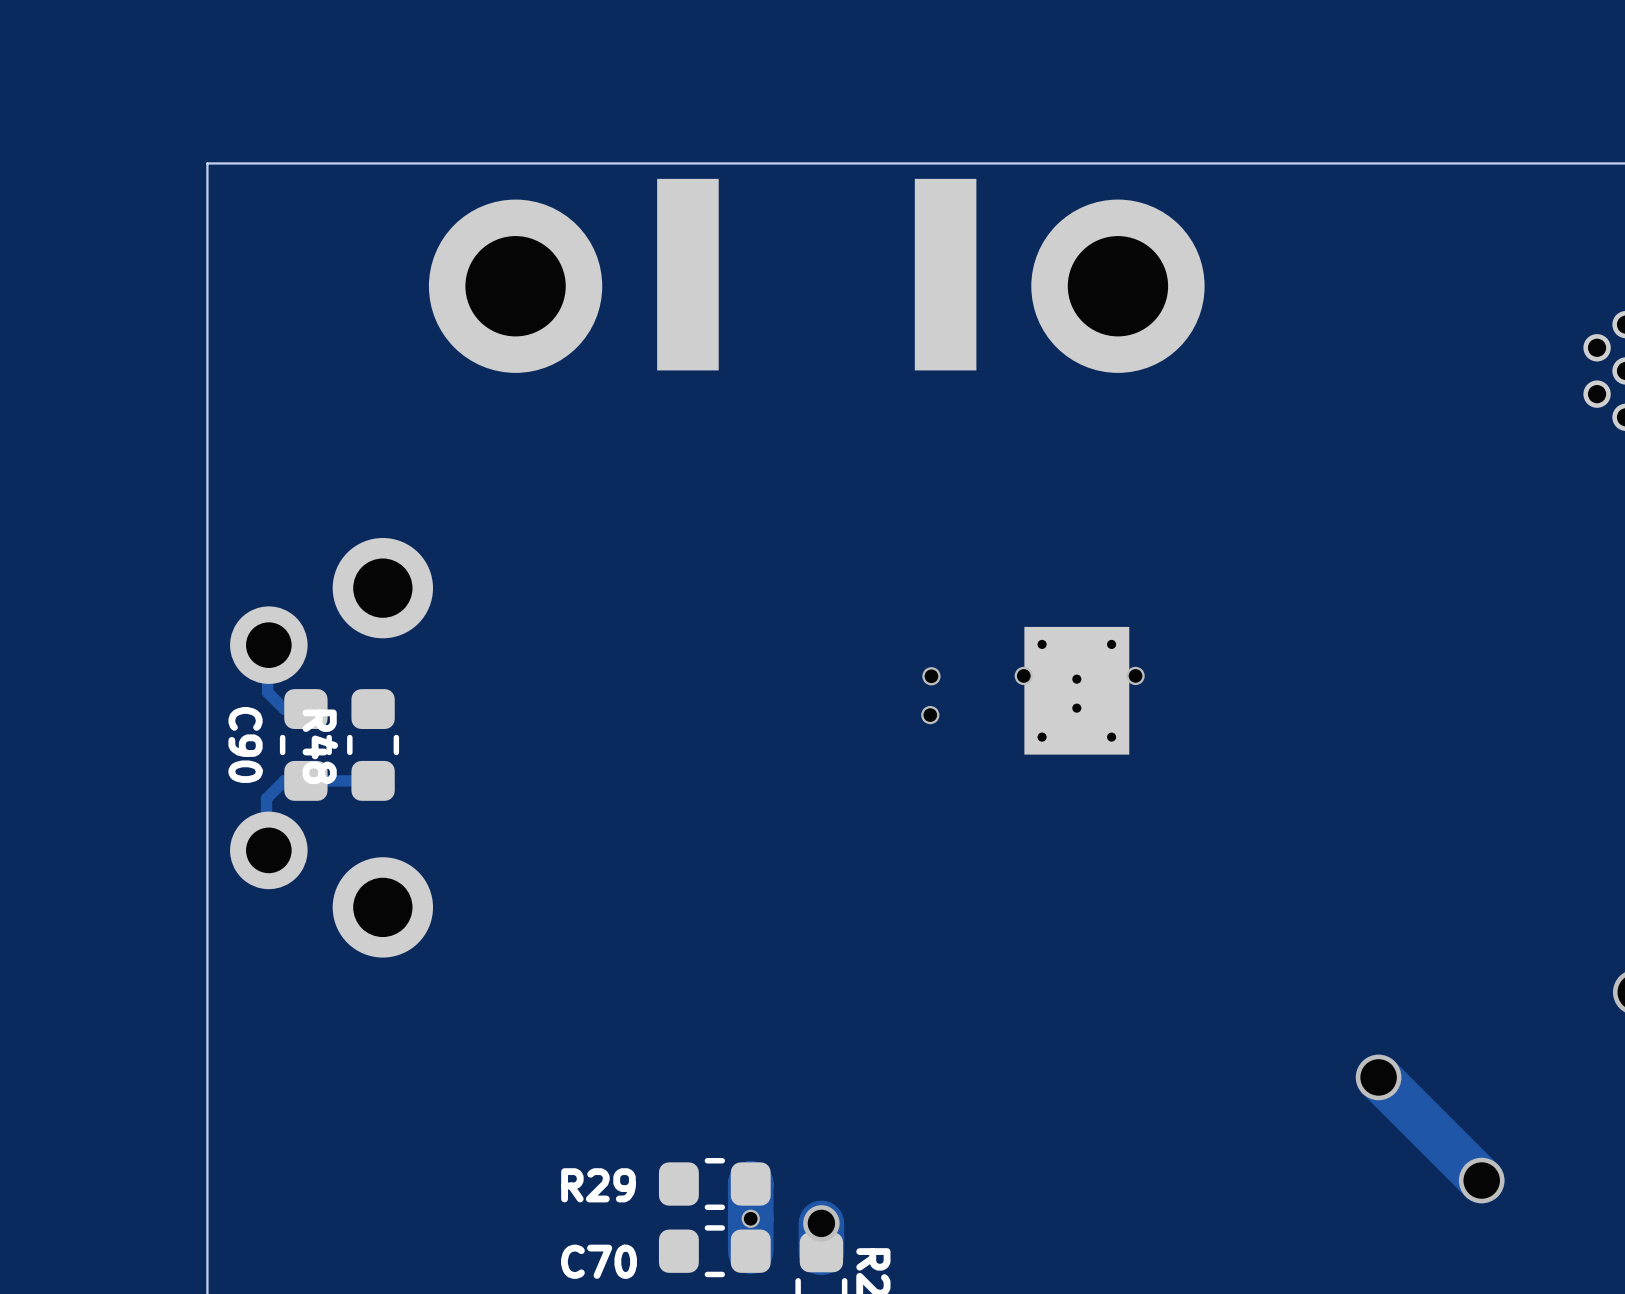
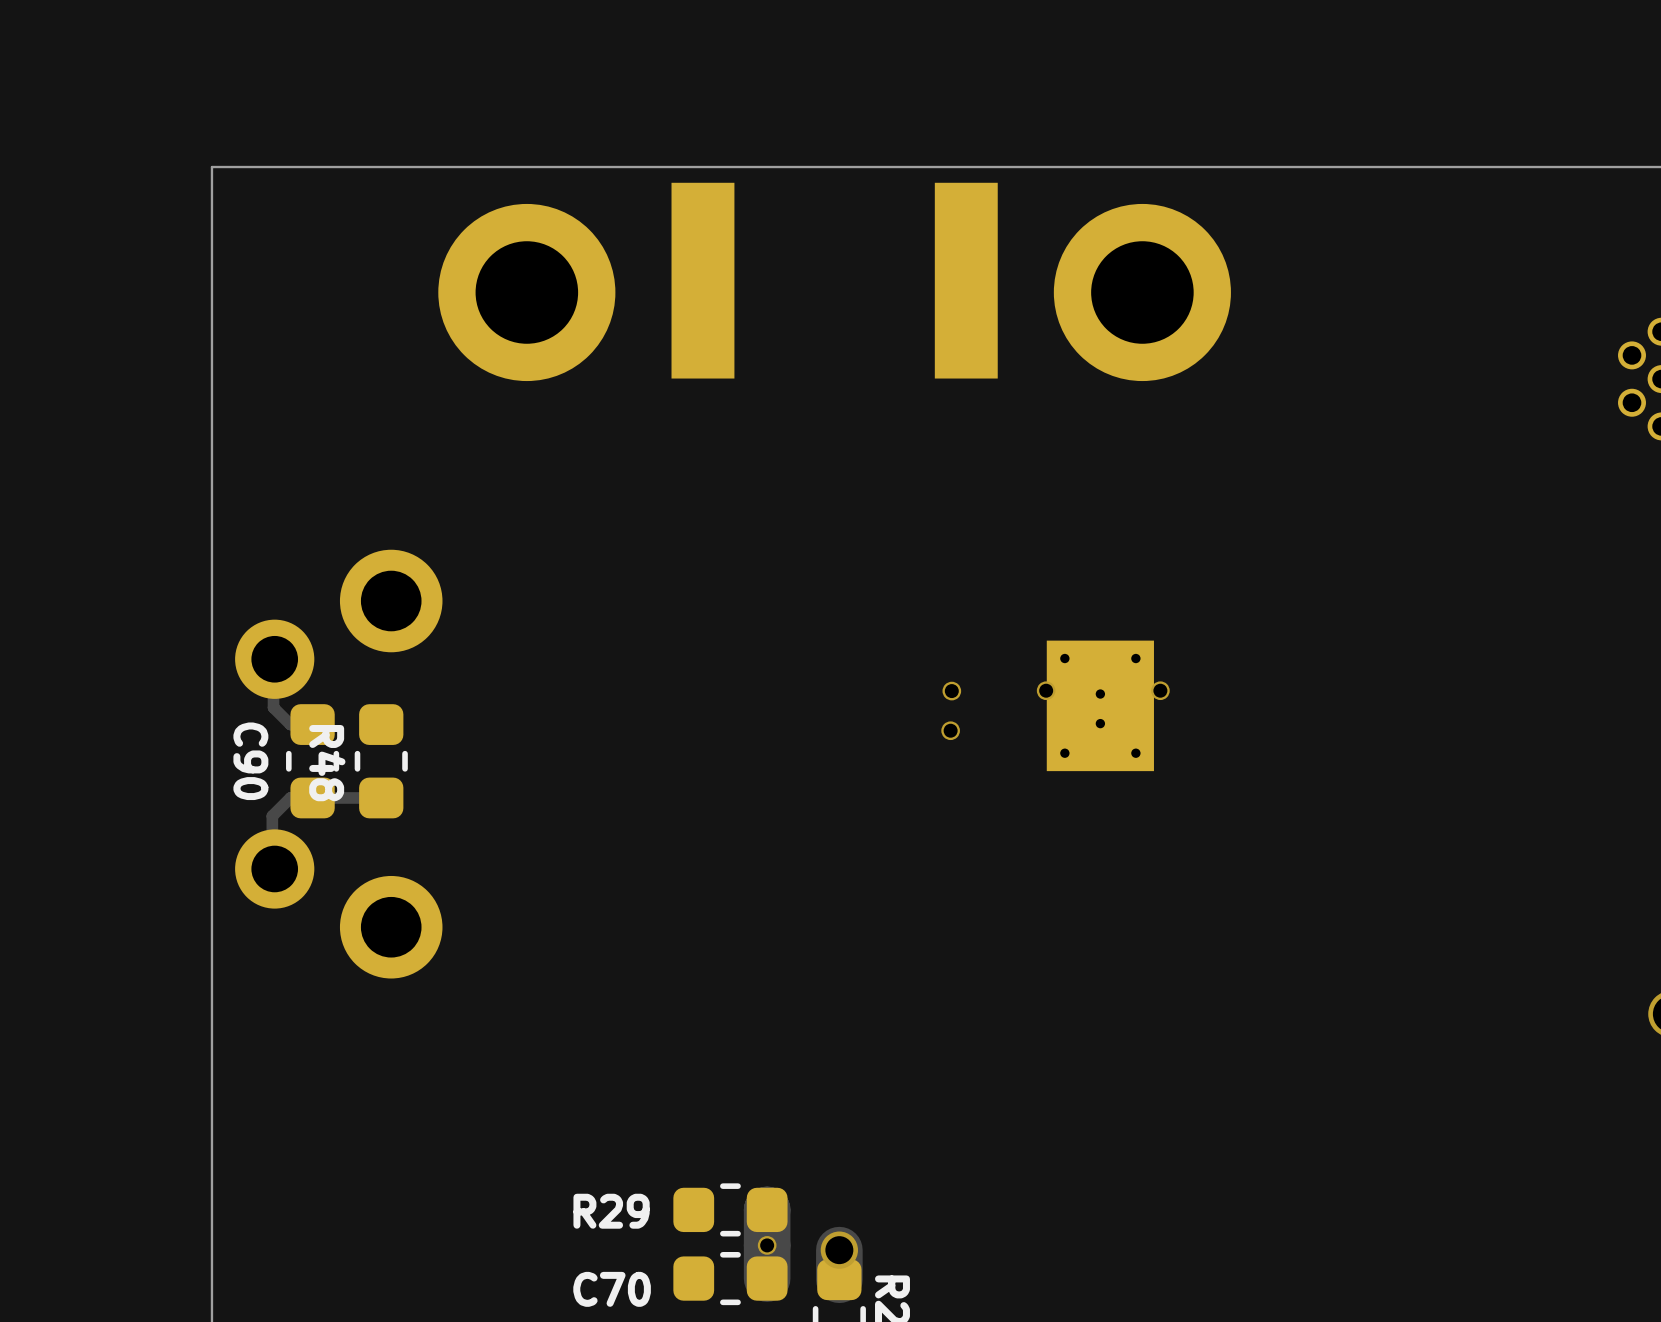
track: (1378, 1077) (1481, 1180) -> none
via: (1378, 1077) -> none
via: (1481, 1180) -> none

